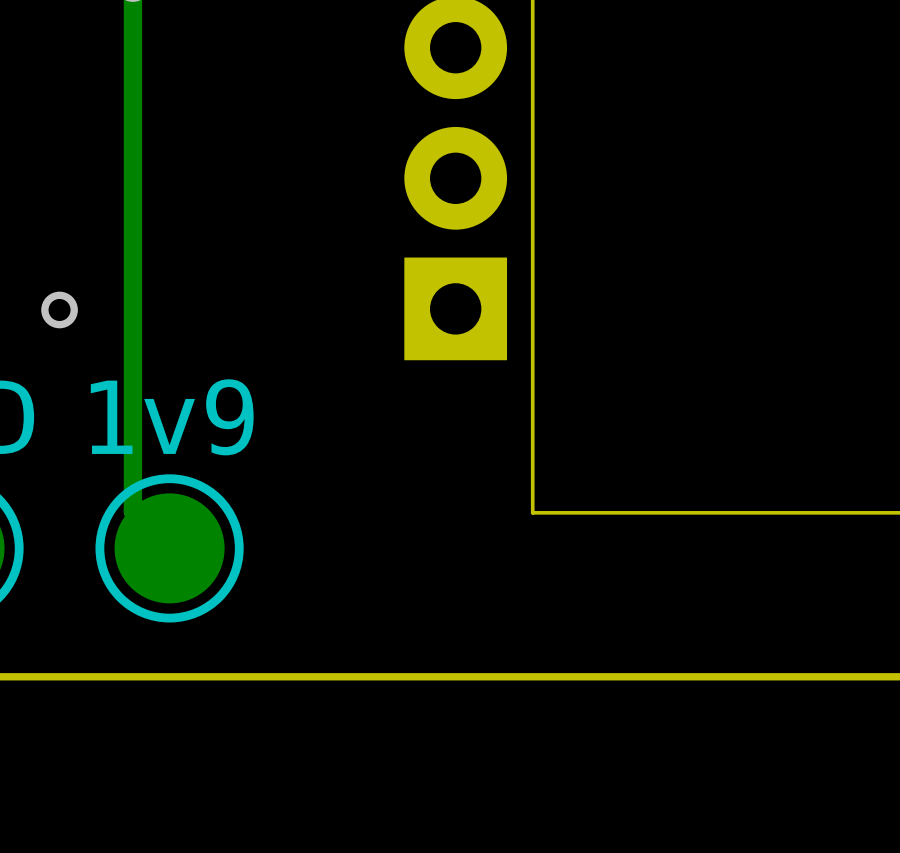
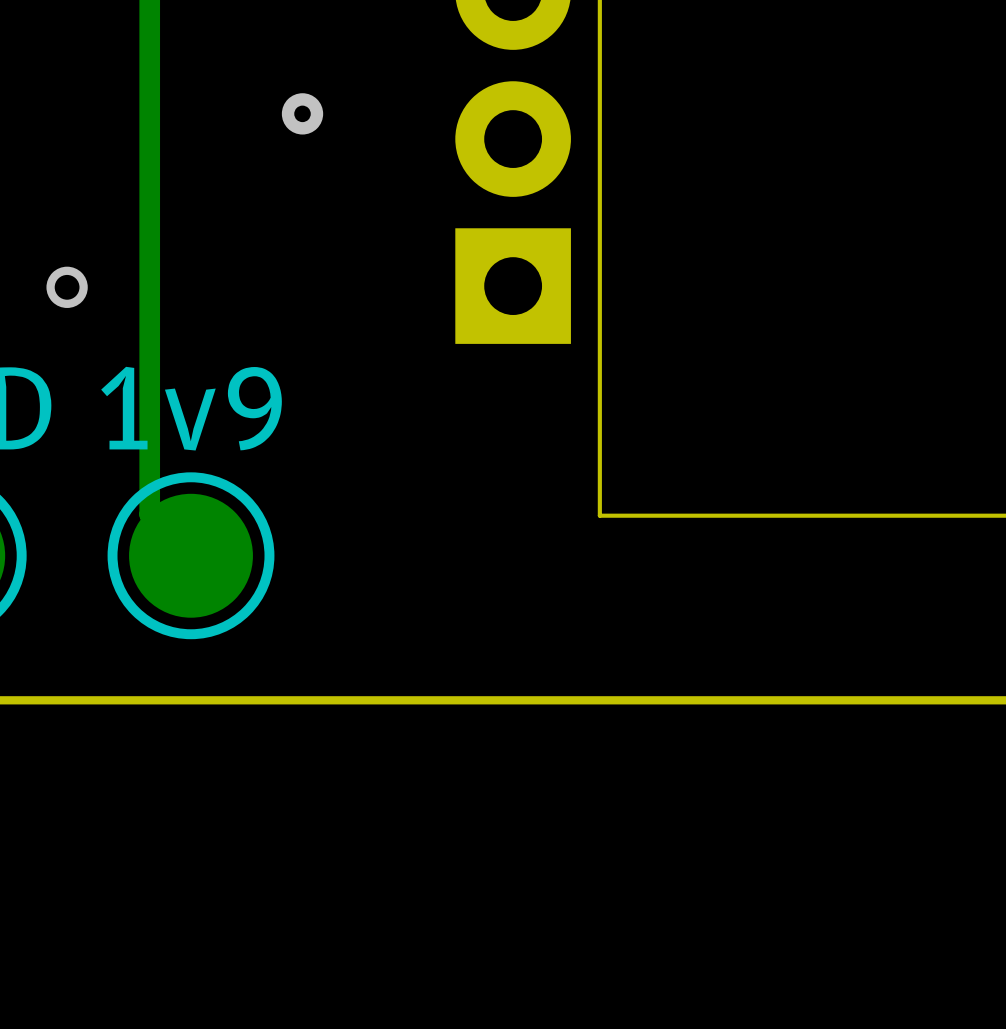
via: none -> (302, 113)

